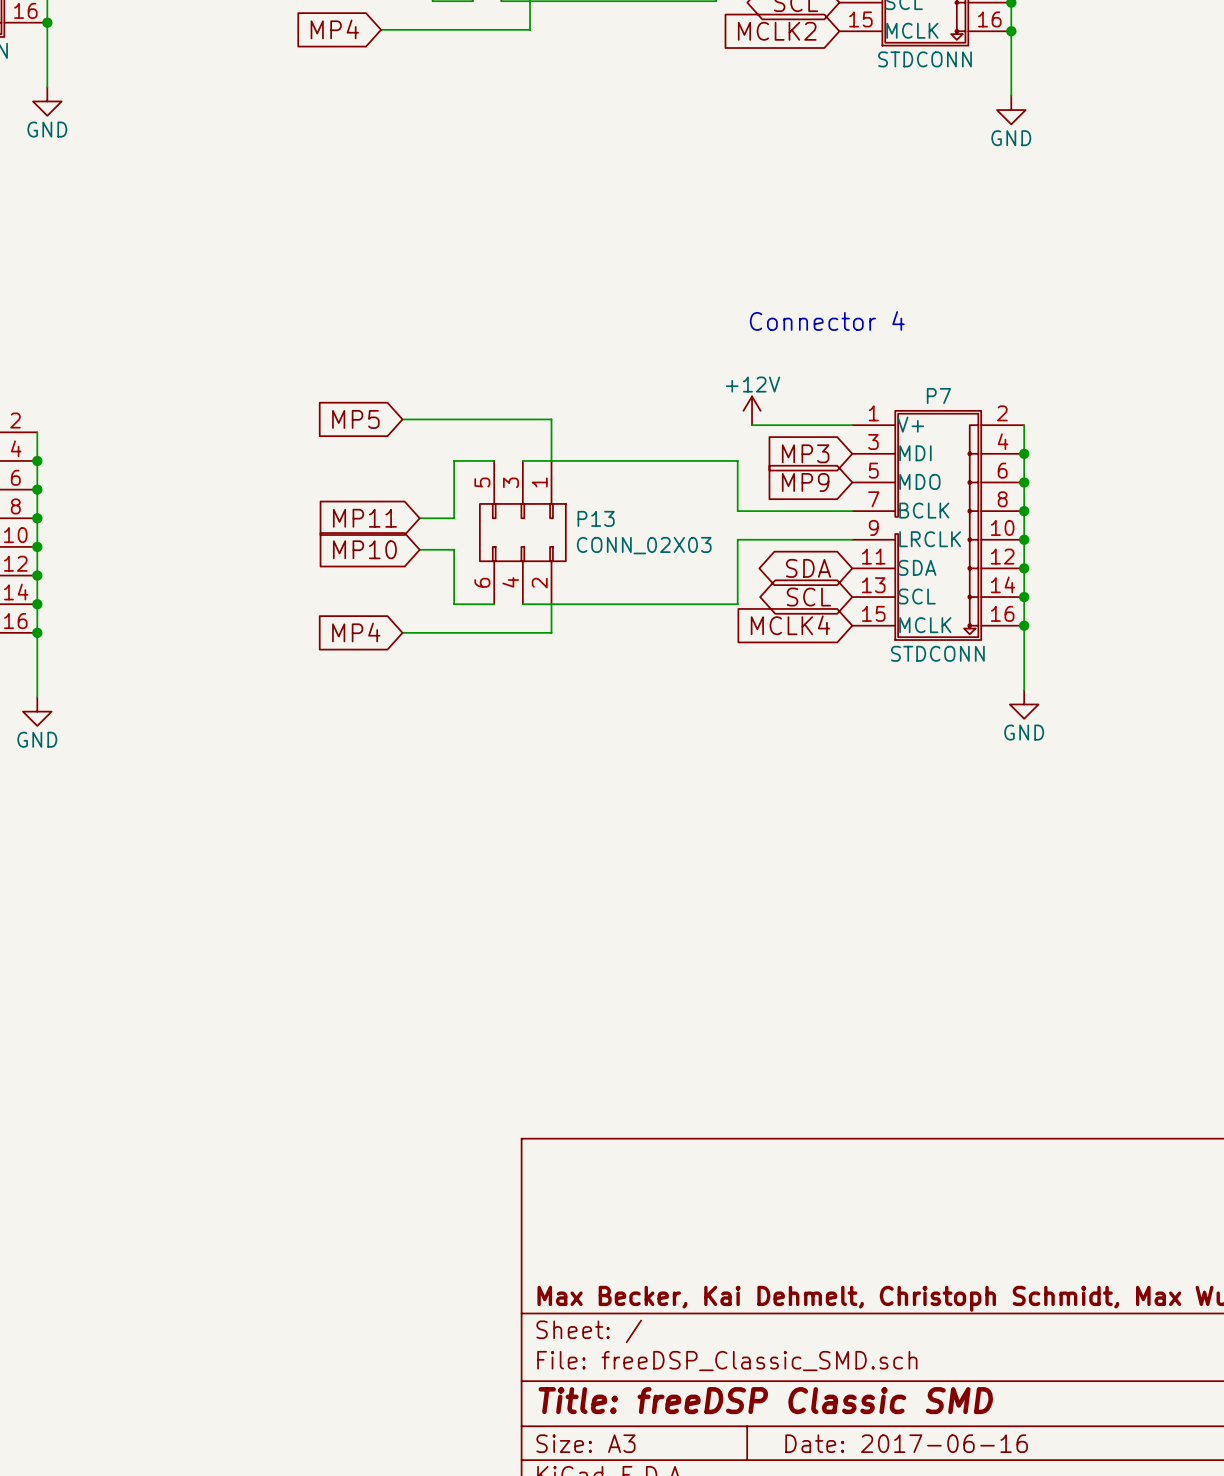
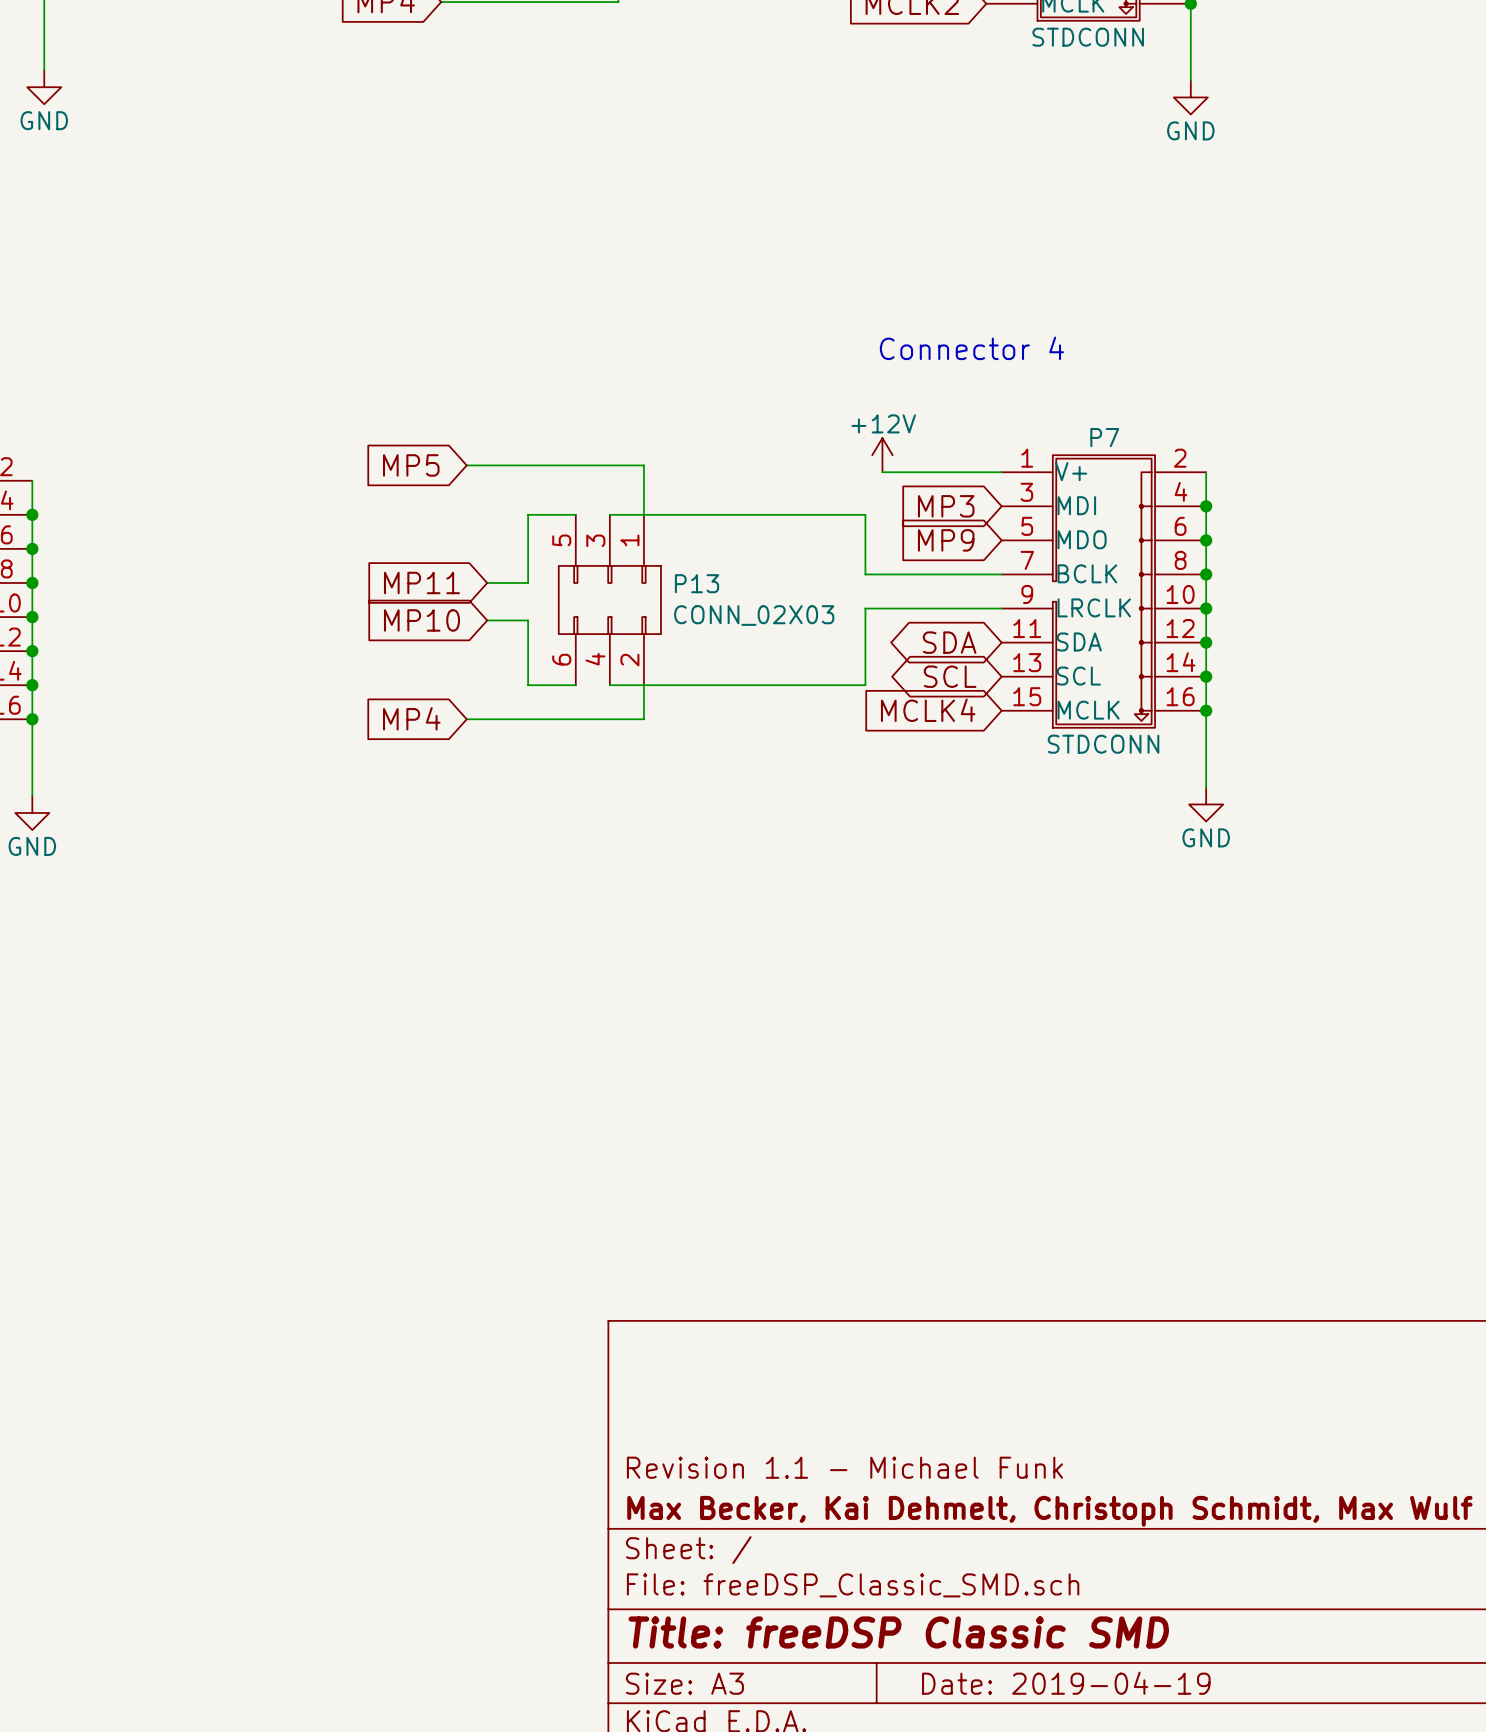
title block: none -> Revision 1.1 - Michael Funk (844, 1467)
title block: Date: 2017-06-16 (906, 1443) -> Date: 2019-04-19 (1066, 1683)

